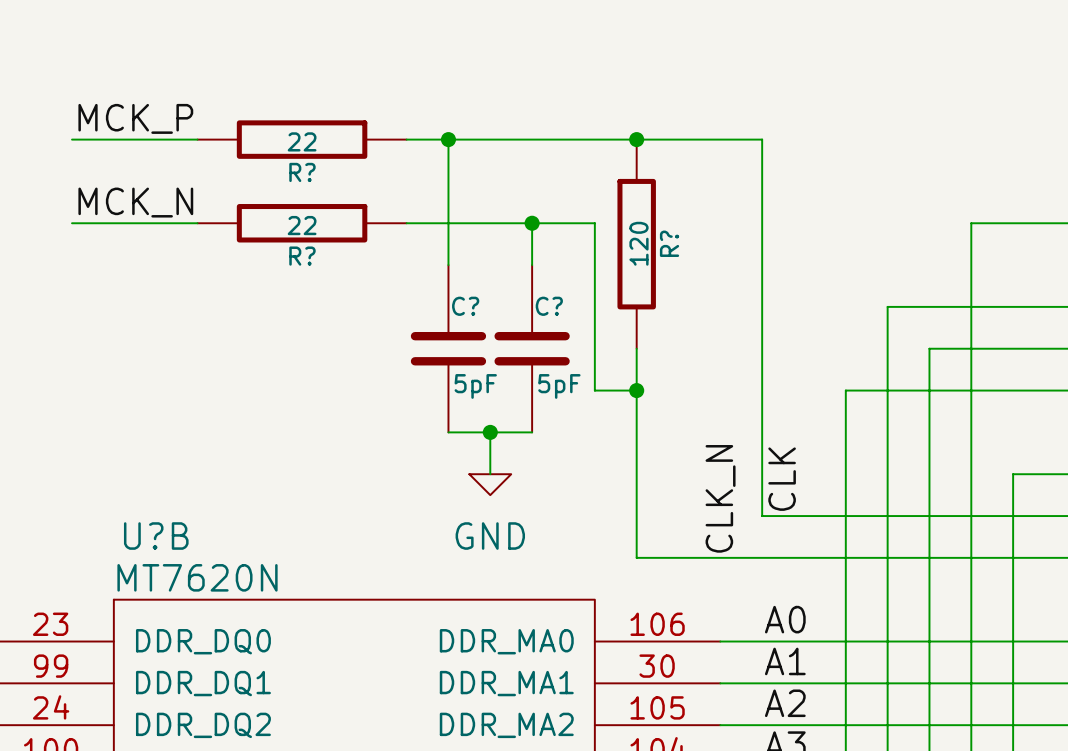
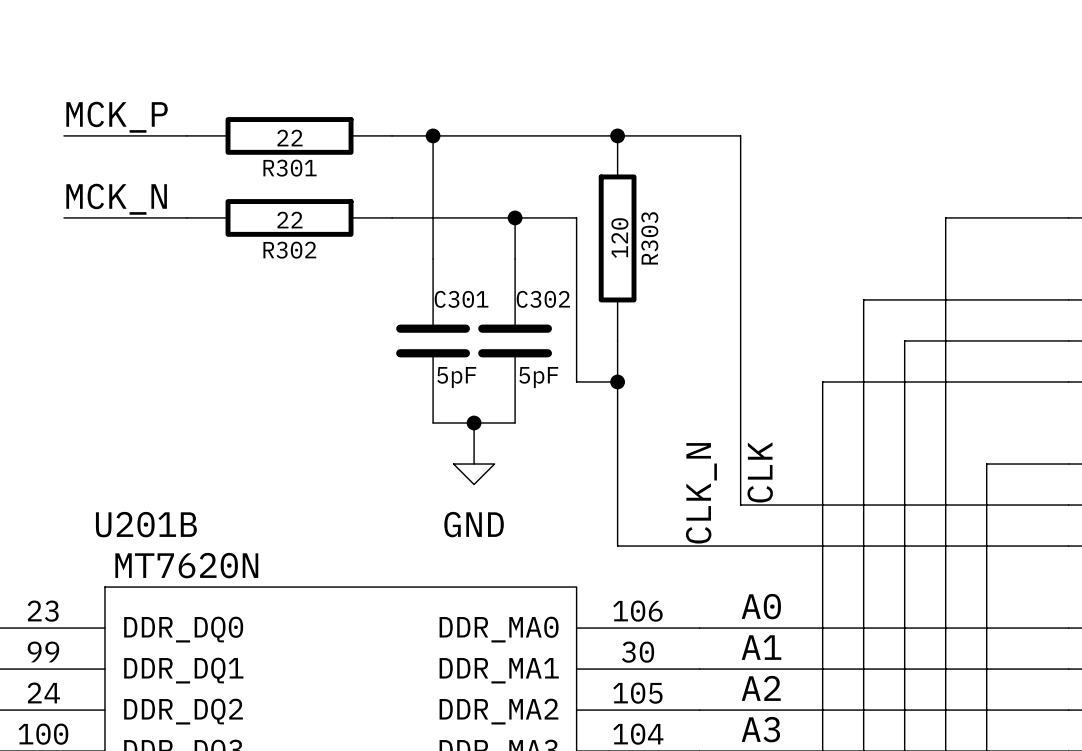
R? name: R? (302, 172) -> R301 (290, 168)
R? name: R? (669, 243) -> R303 (649, 238)
R? name: R? (302, 256) -> R302 (289, 250)
C? name: C? (465, 306) -> C301 (461, 299)
C? name: C? (549, 306) -> C302 (543, 299)
U?B name: U?B (156, 536) -> U201B (146, 524)

